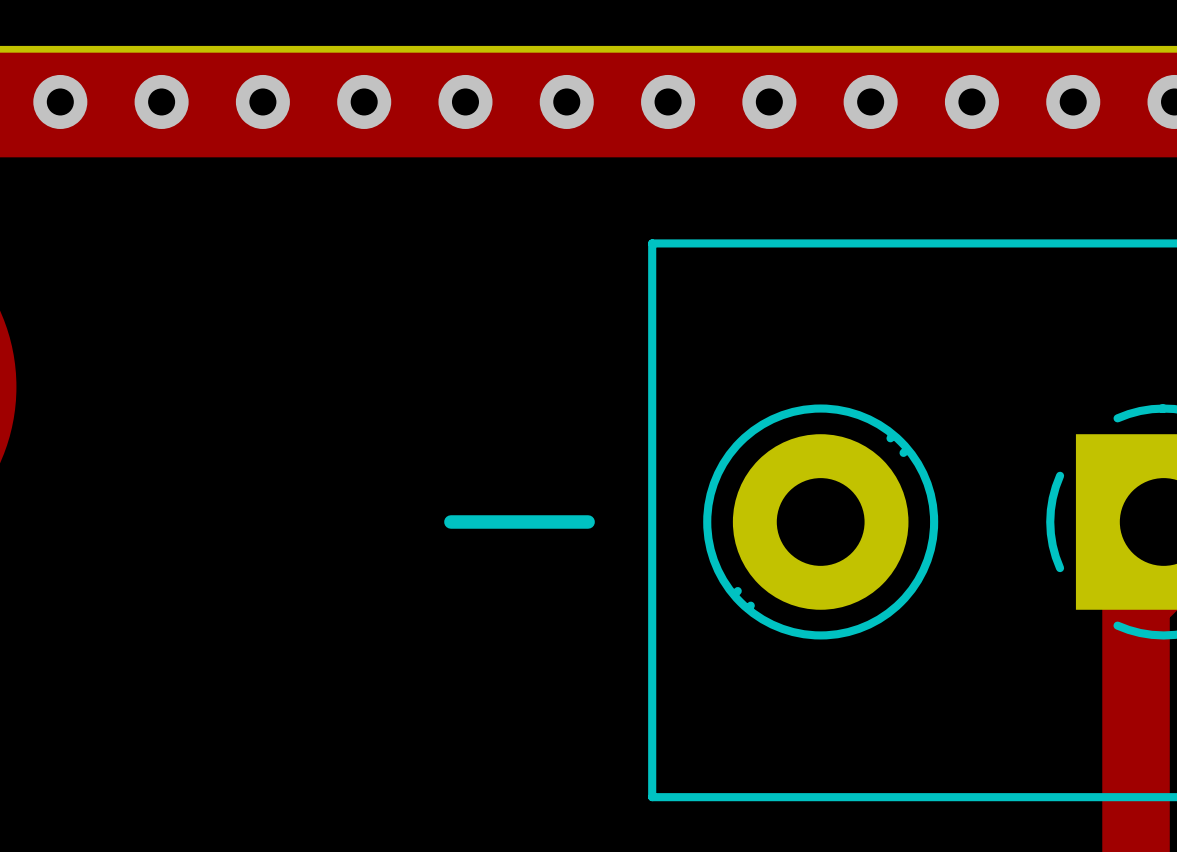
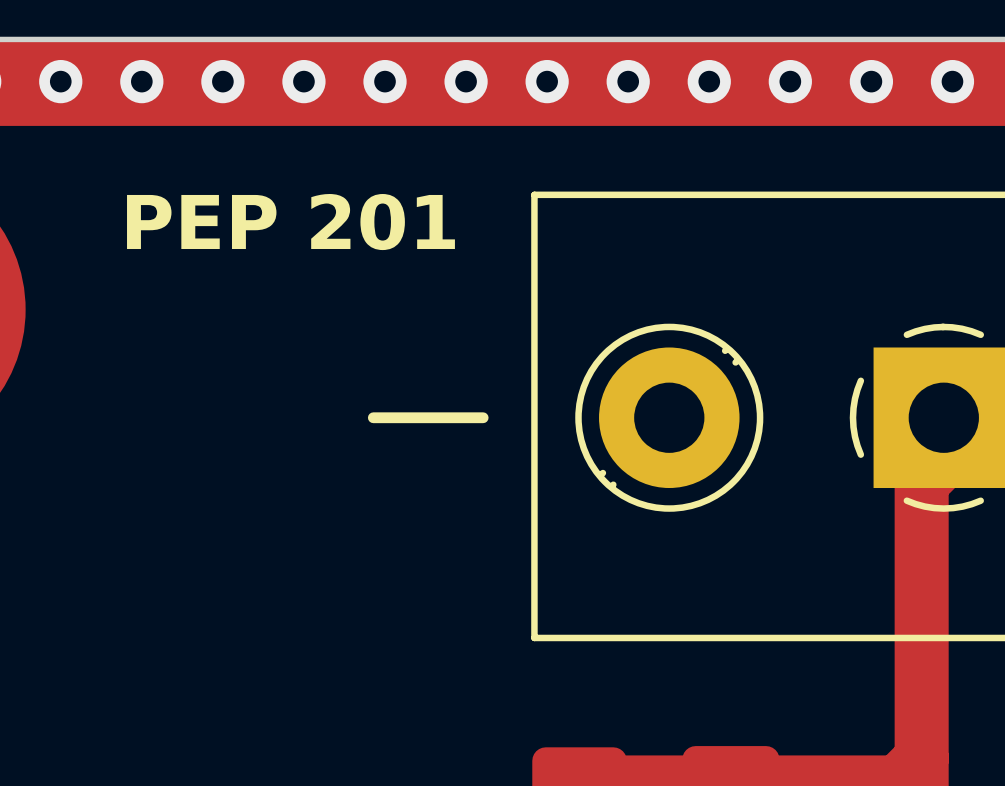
text: none -> PEP 201 (290, 222)

